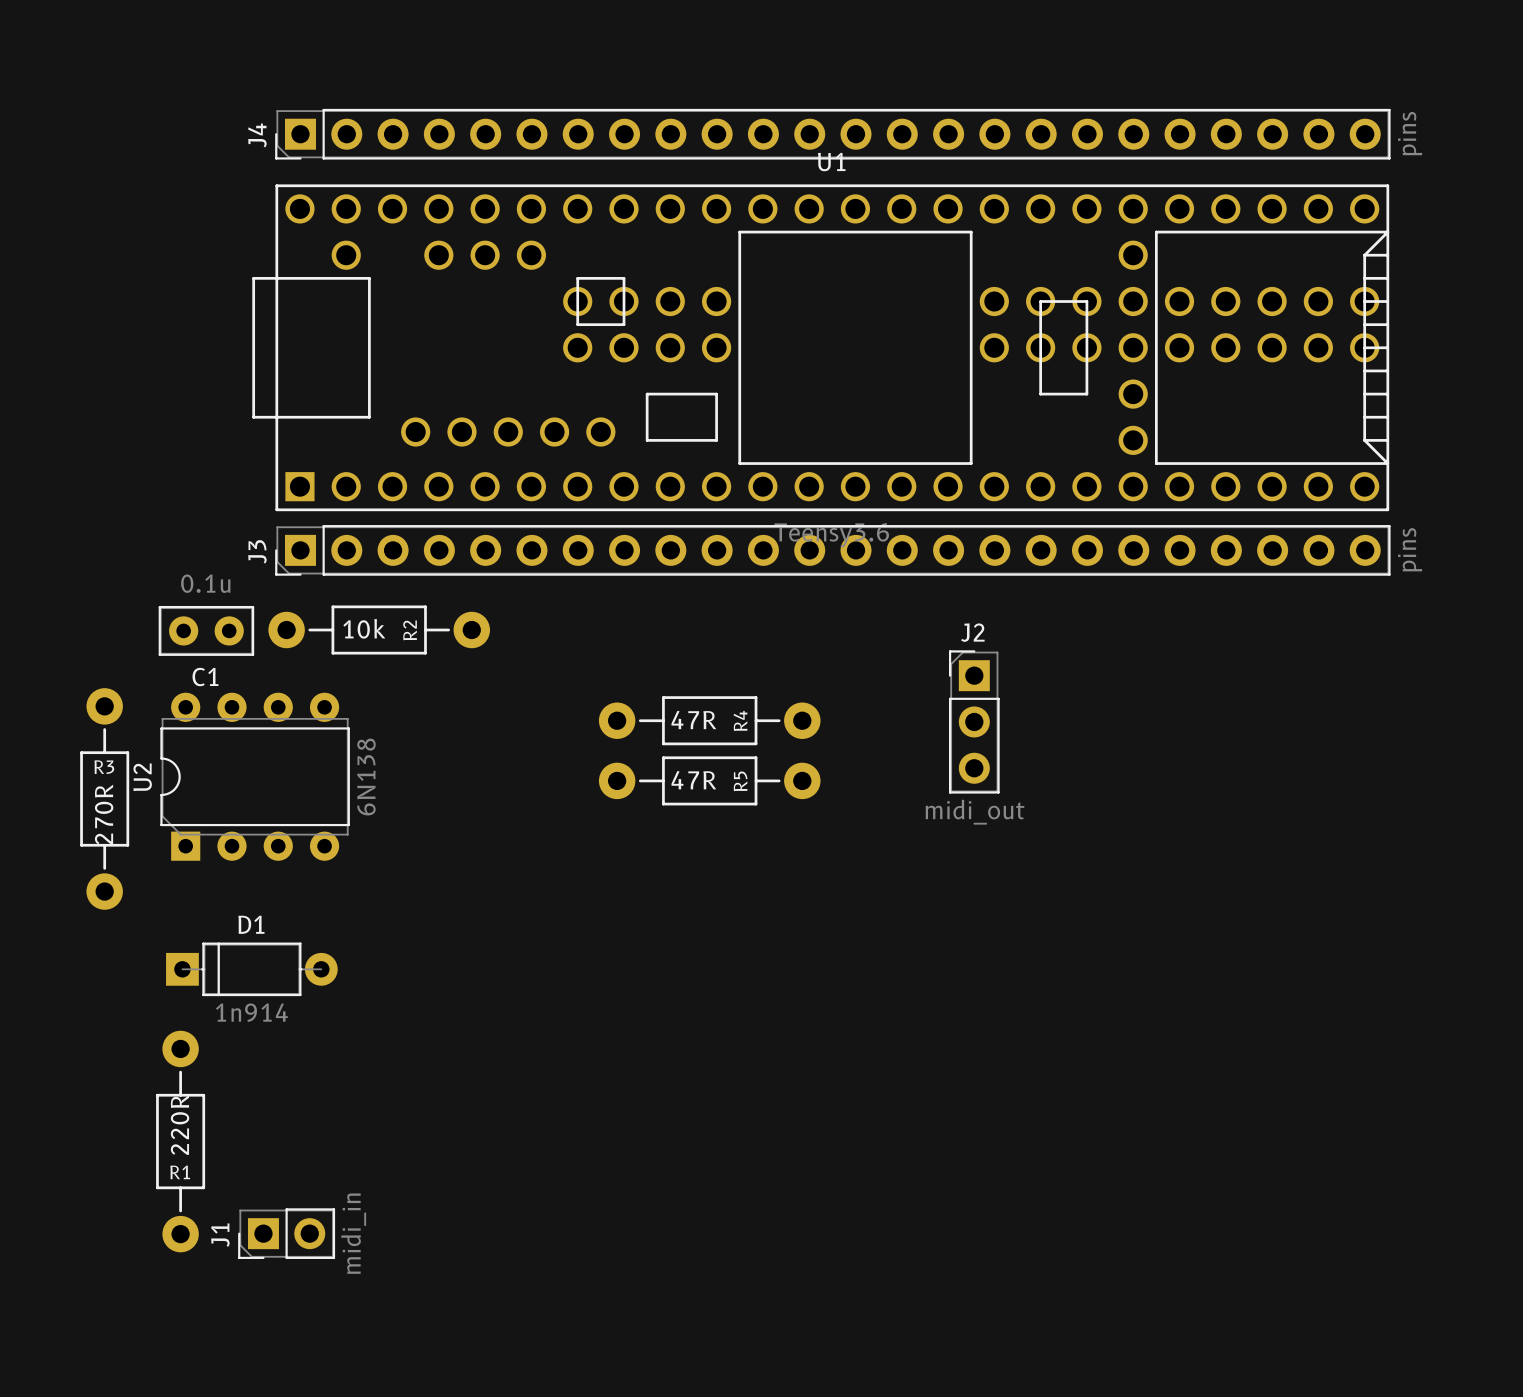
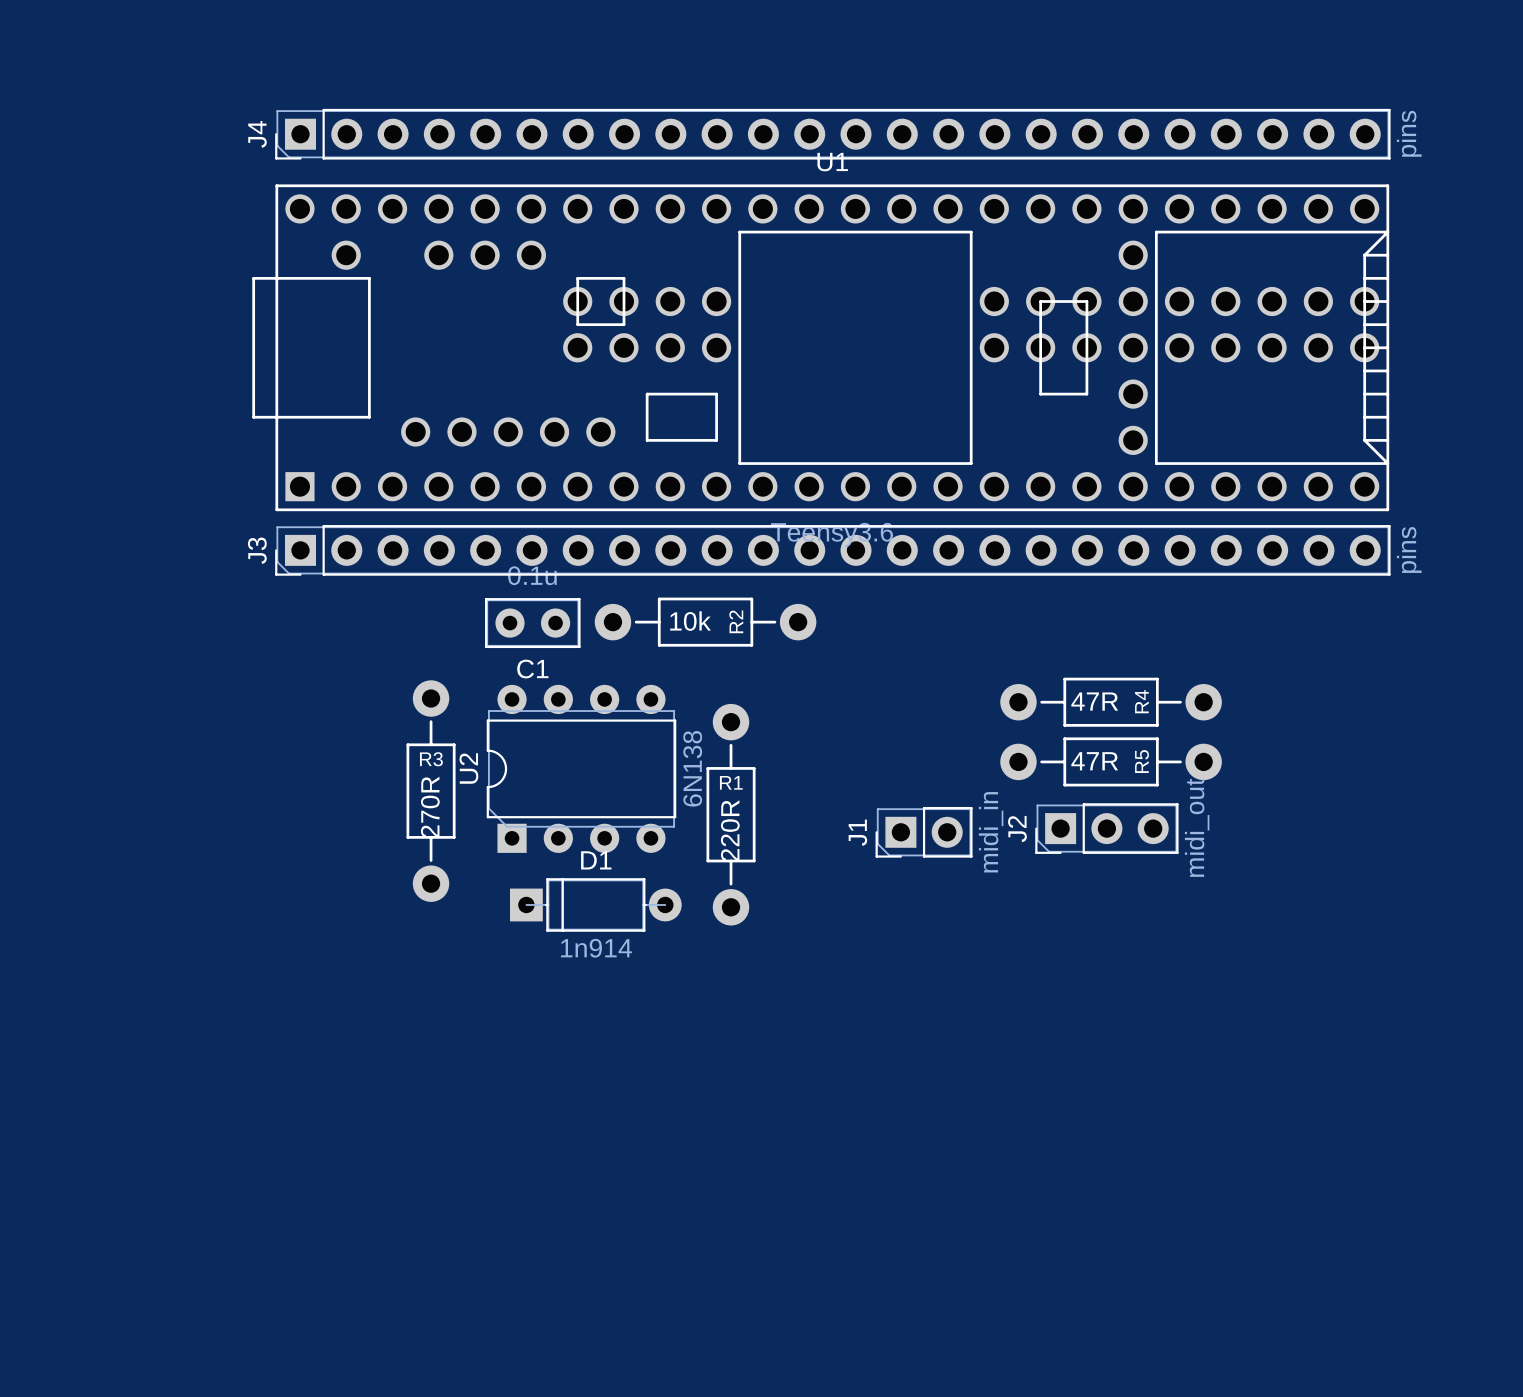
C1 position: (206, 630) -> (532, 623)
R2 position: (379, 630) -> (705, 622)
R4 position: (709, 720) -> (1111, 702)
J2 rotation: 0° (974, 721) -> 90° counterclockwise (1106, 828)
J2 position: (974, 721) -> (1106, 828)
U2 position: (255, 776) -> (581, 768)
R5 position: (709, 780) -> (1111, 761)
R3 position: (104, 798) -> (431, 791)
D1 position: (251, 969) -> (595, 904)
R1 value position: 220R (180, 1124) -> 220R (730, 830)
R1 position: (180, 1141) -> (731, 814)
R1 name position: R1 (180, 1172) -> R1 (731, 782)
J1 position: (286, 1233) -> (924, 832)

